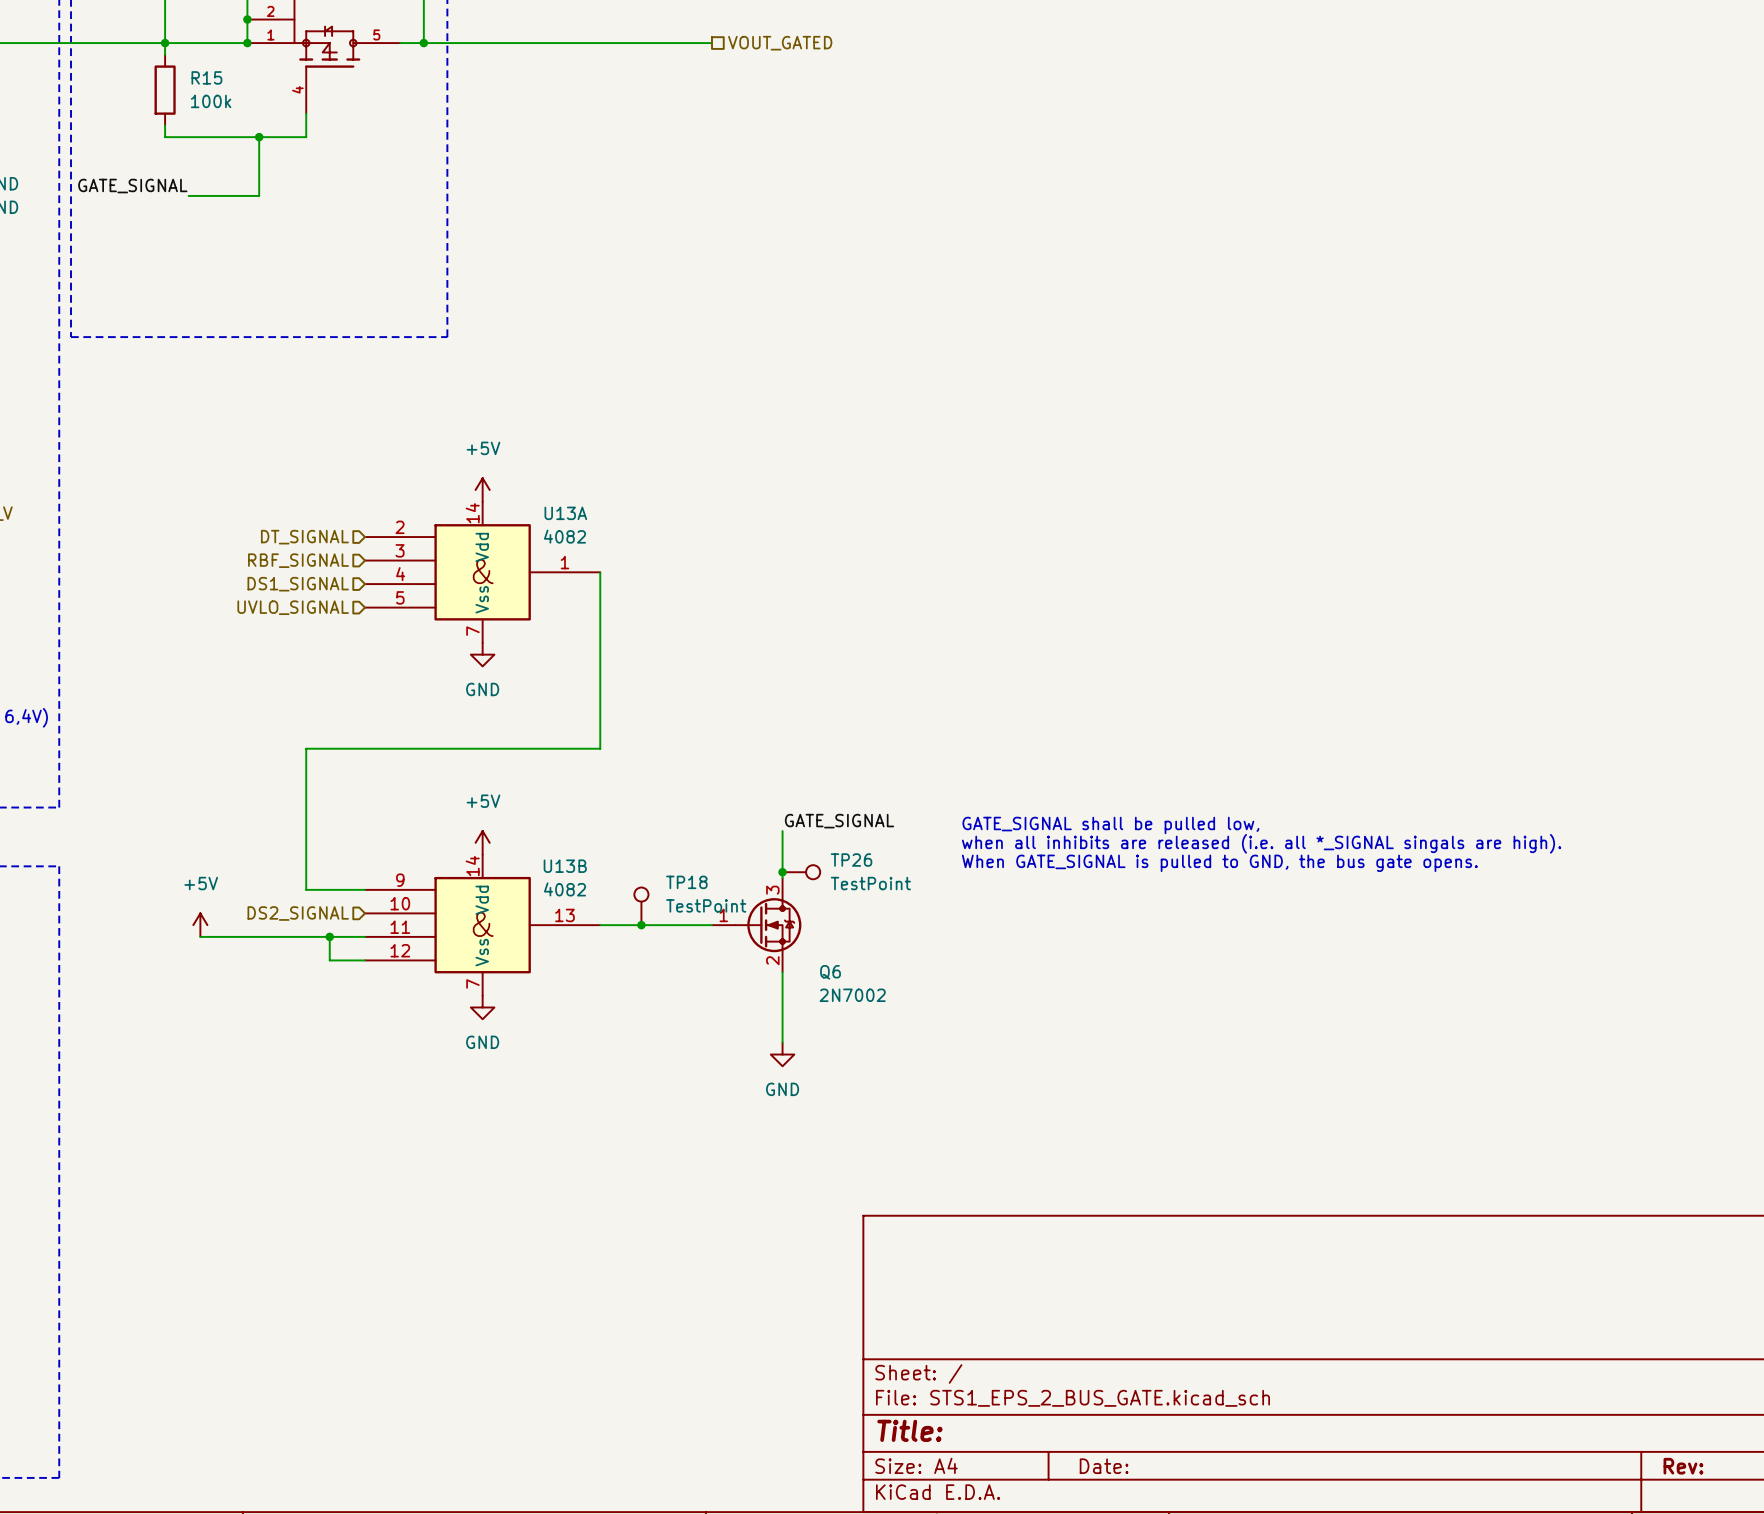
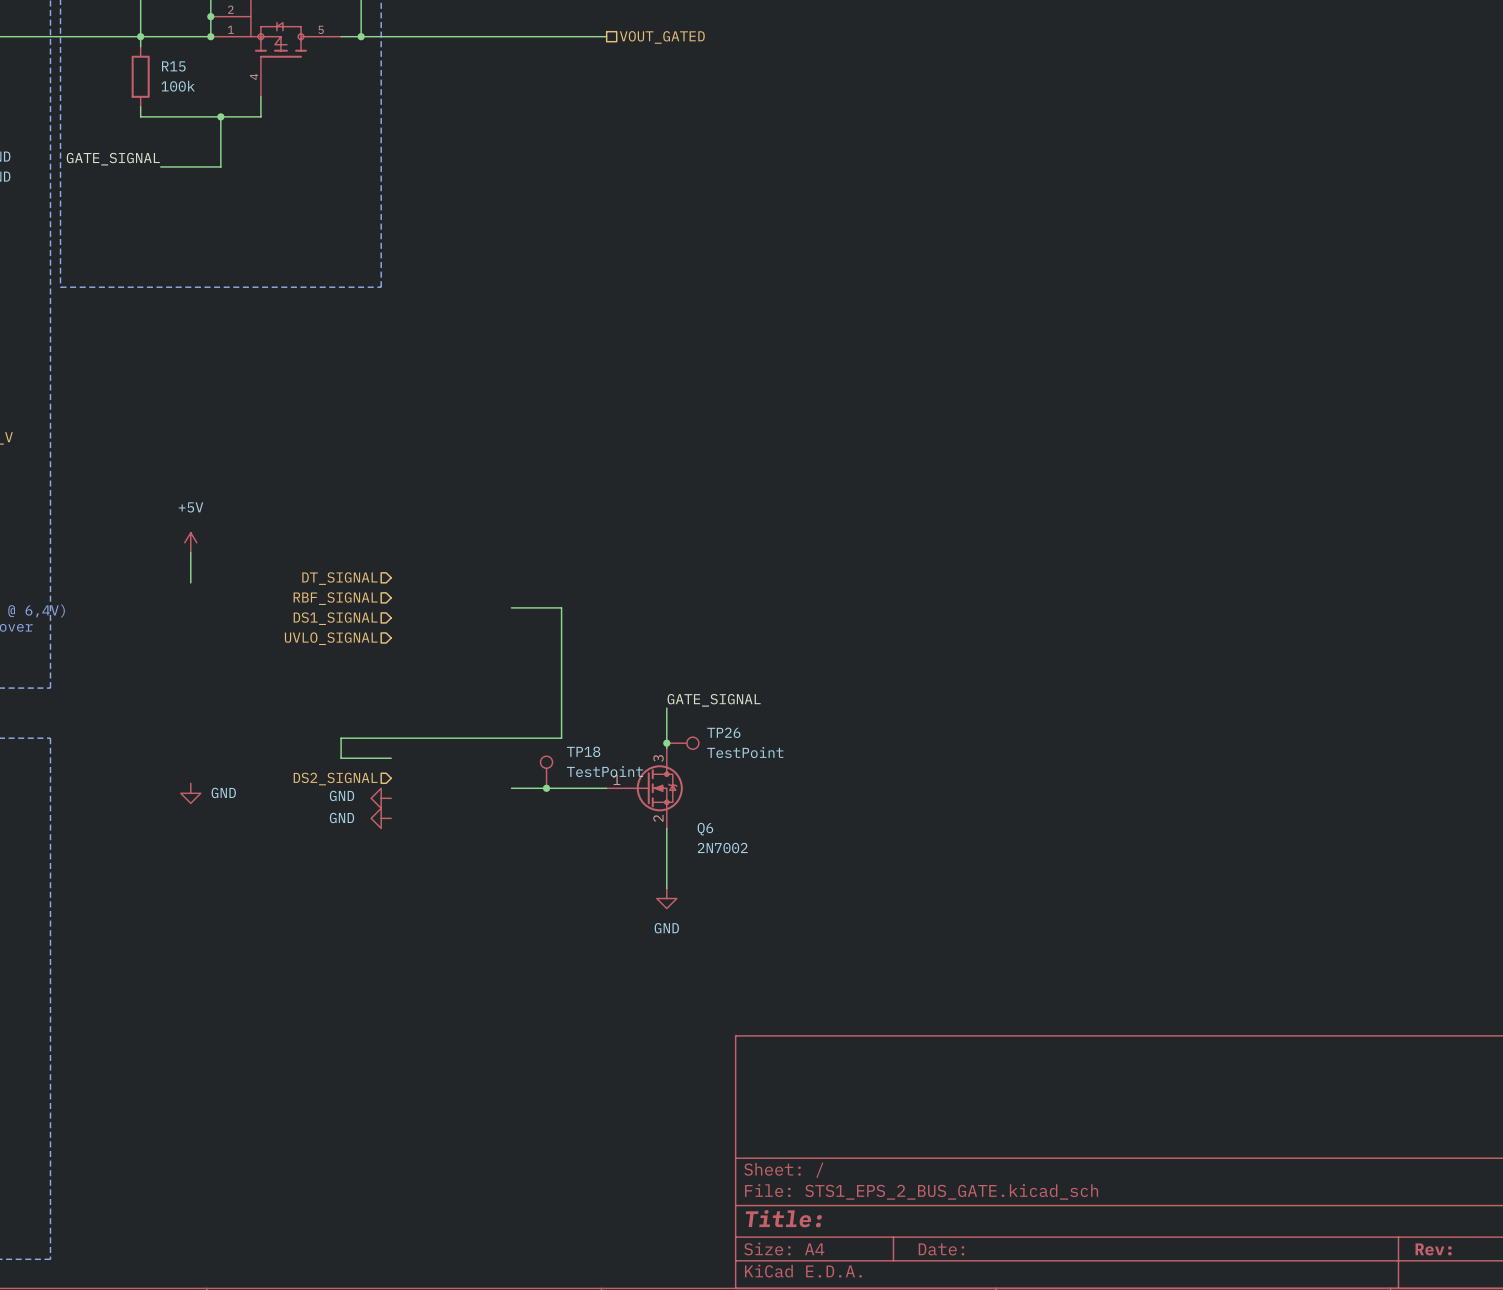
power symbol: +5V (482, 489) -> none
hierarchical label position: DT_SIGNAL (304, 537) -> DT_SIGNAL (339, 578)
hierarchical label position: RBF_SIGNAL (298, 560) -> RBF_SIGNAL (335, 598)
U13A: 4082 (482, 572) -> none
wire: (600, 572) (600, 748) (306, 748) (306, 889) (365, 889) -> none
hierarchical label position: DS1_SIGNAL (298, 584) -> DS1_SIGNAL (335, 618)
hierarchical label position: UVLO_SIGNAL (293, 607) -> UVLO_SIGNAL (331, 638)
power symbol: none -> +5V (190, 542)
wire: none -> (190, 552) (190, 582)
power symbol: GND (482, 654) -> none
wire: none -> (511, 607) (561, 607) (561, 738) (341, 738) (341, 758) (391, 758)
text: GATE_SIGNAL shall be pulled low, (1110, 825) -> none
power symbol: +5V (482, 842) -> none
text: when all inhibits are released (i.e. all *_SIGNAL singals are high). (1261, 843) -> none
text: When GATE_SIGNAL is pulled to GND, the bus gate opens. (1219, 863) -> none
hierarchical label position: DS2_SIGNAL (298, 913) -> DS2_SIGNAL (335, 779)
power symbol: +5V (200, 925) -> none
U13B: 4082 (482, 925) -> none
power symbol: none -> GND (190, 793)
wire: (200, 936) (365, 936) -> none
wire: (329, 936) (329, 960) (365, 960) -> none
junction: (329, 936) -> none
power symbol: none -> GND (381, 798)
power symbol: none -> GND (381, 818)
power symbol: GND (482, 1007) -> none

